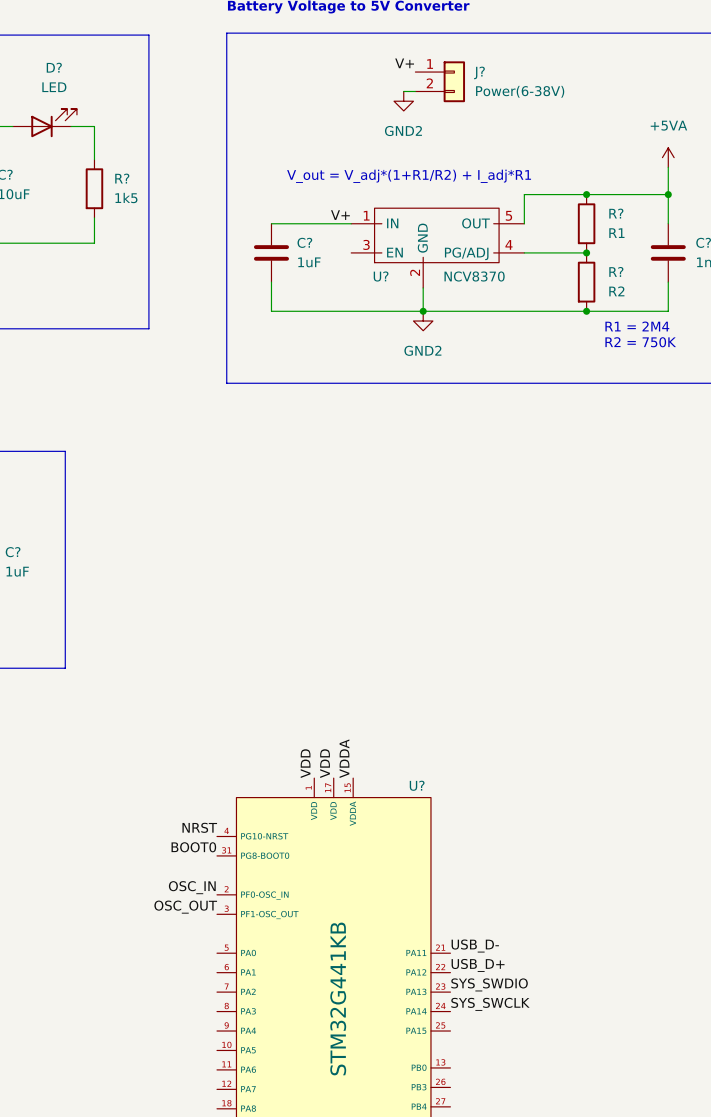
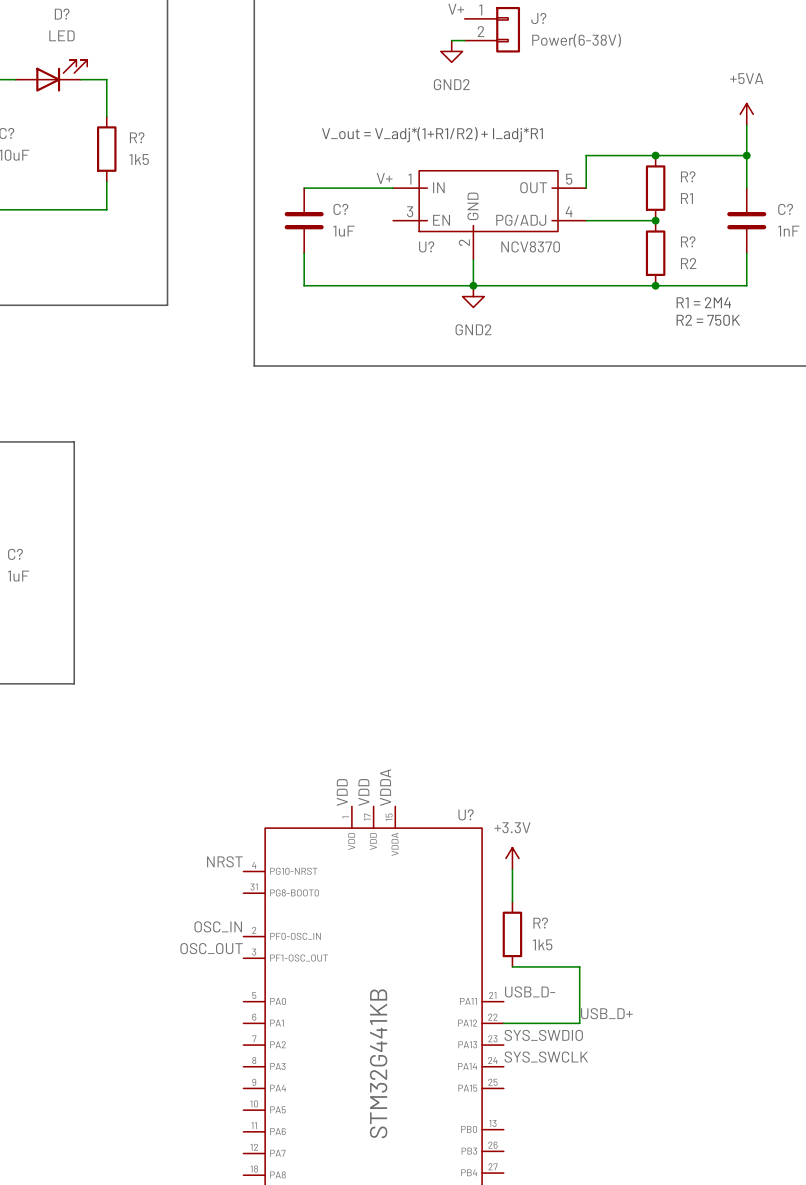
power symbol: none -> +3.3V (512, 858)
wire: none -> (512, 869) (512, 901)
label: BOOT0 (193, 847) -> none
R?: none -> 1k5 (512, 934)
wire: none -> (512, 966) (579, 966) (579, 1023) (503, 1023)
label position: USB_D+ (478, 965) -> USB_D+ (606, 1013)

